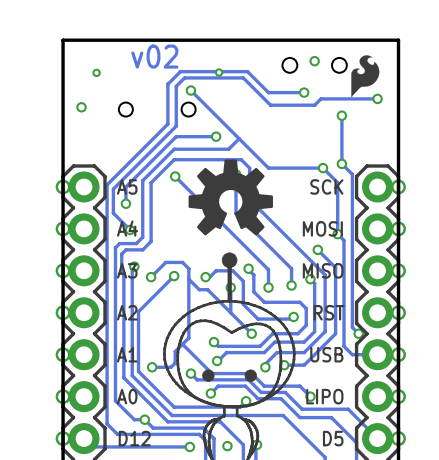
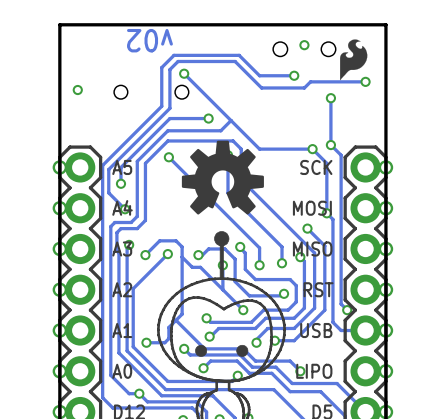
text rotation: 0° (154, 56) -> 180° (149, 40)
via: (96, 72) -> none
via: (219, 72) -> none

